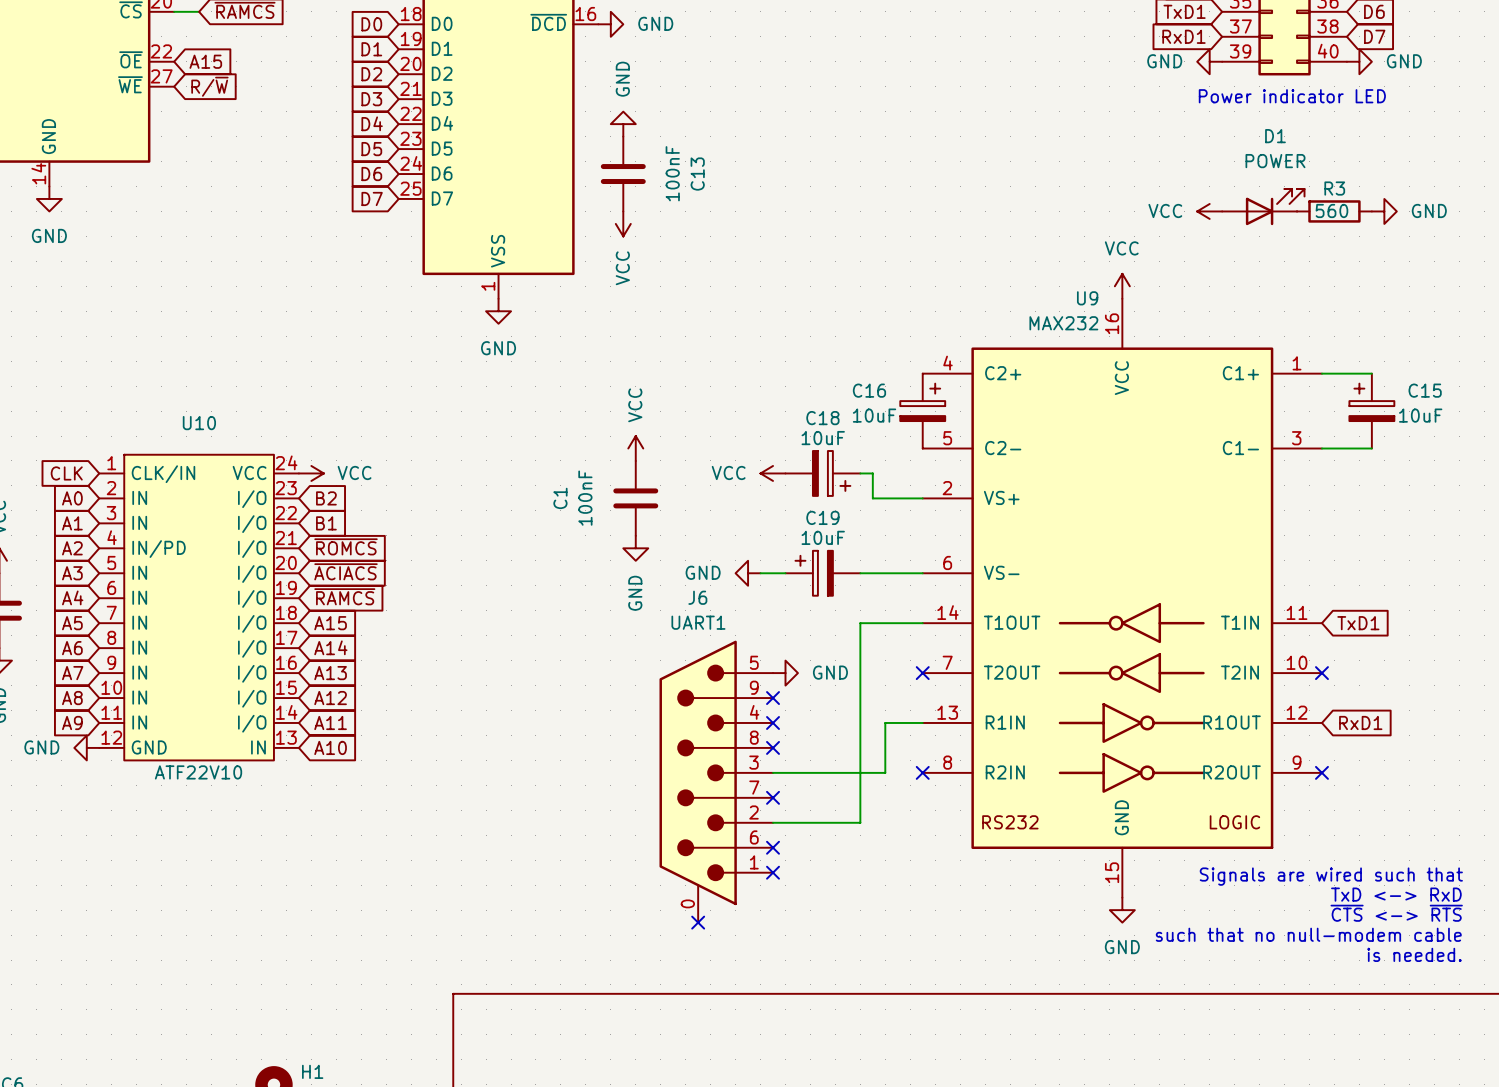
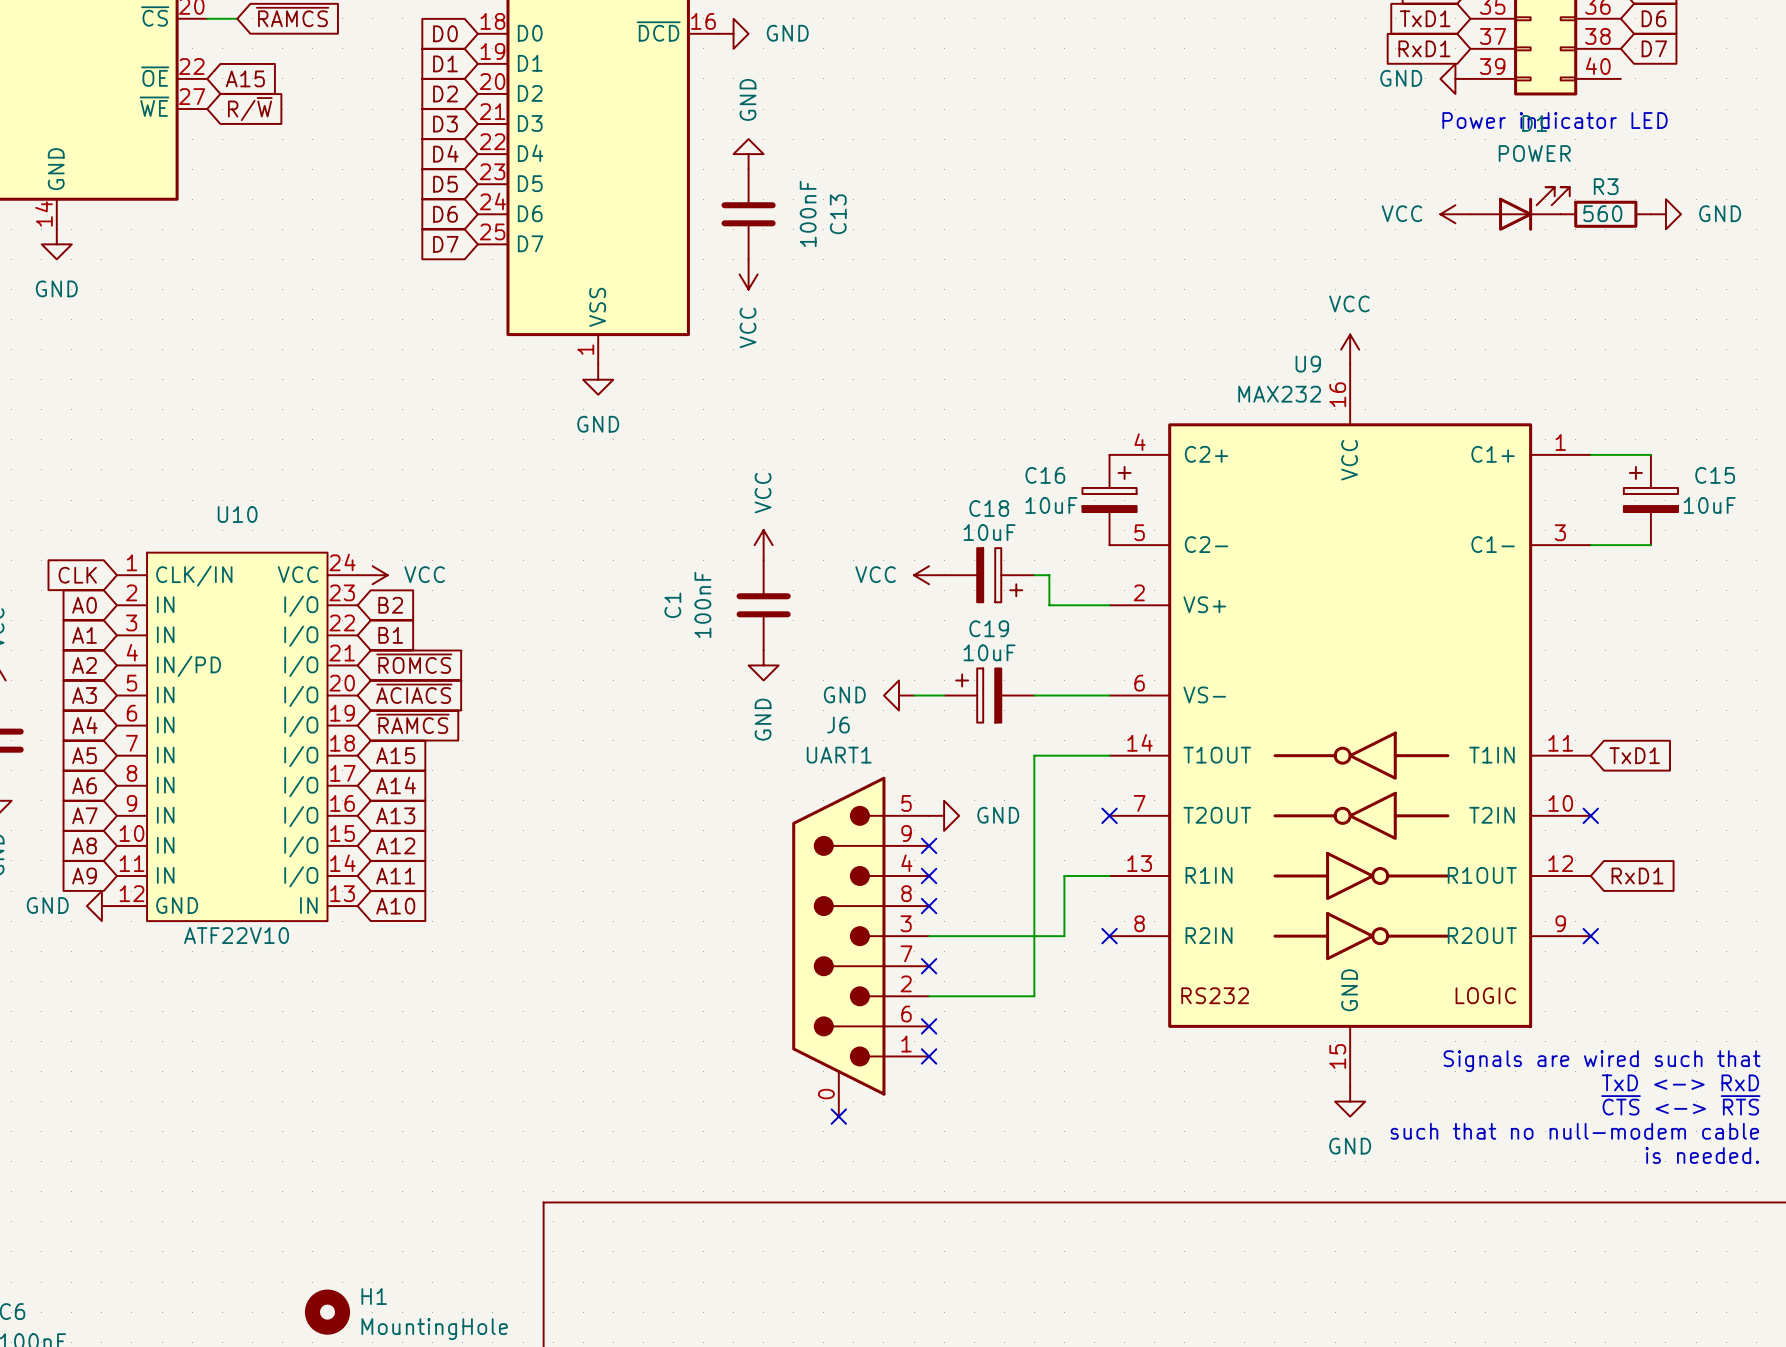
power symbol: GND (1359, 61) -> none
D1 position: (1263, 207) -> (1520, 209)
power symbol position: VCC (1209, 211) -> VCC (1455, 214)
R3 position: (1334, 211) -> (1605, 214)
power symbol position: GND (1384, 211) -> GND (1665, 214)

